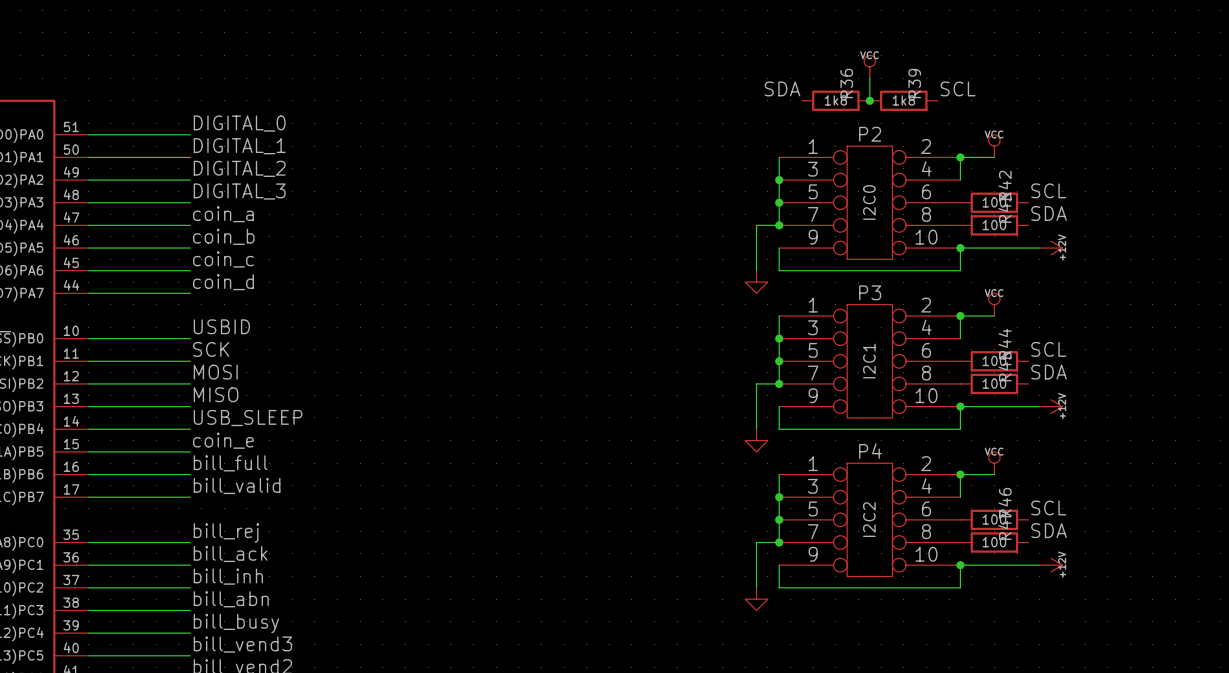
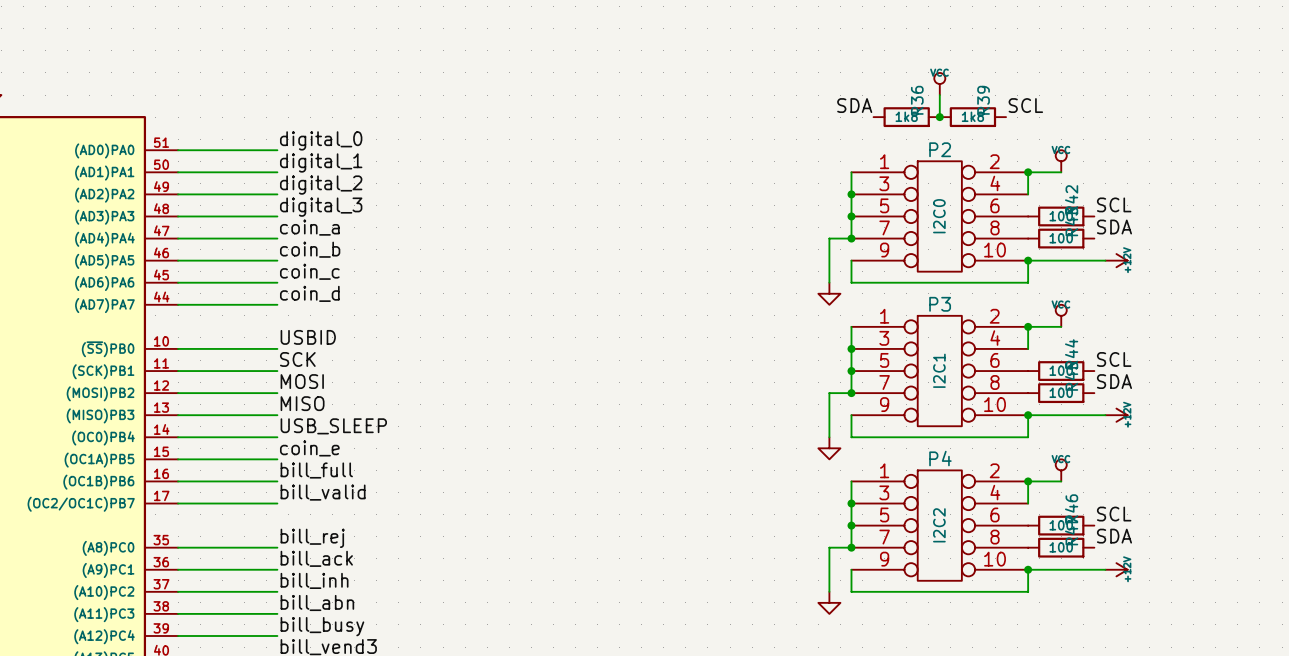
label: DIGITAL_0 (239, 123) -> digital_0 (321, 140)
label: DIGITAL_1 (239, 146) -> digital_1 (321, 162)
label: DIGITAL_2 (239, 168) -> digital_2 (321, 185)
label: DIGITAL_3 (239, 191) -> digital_3 (321, 207)

